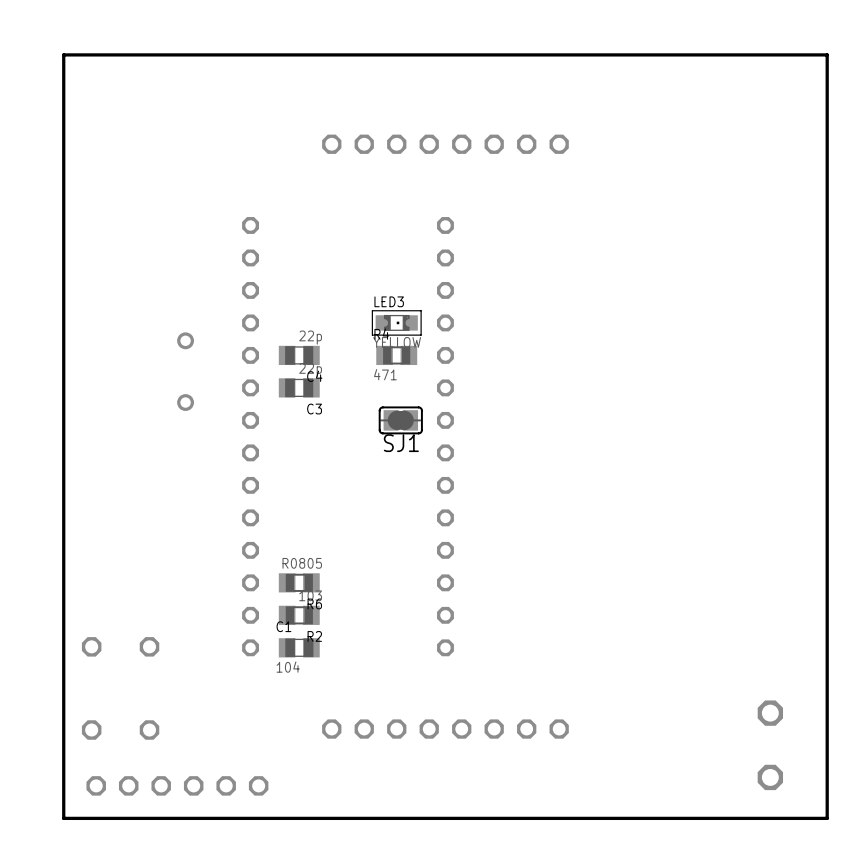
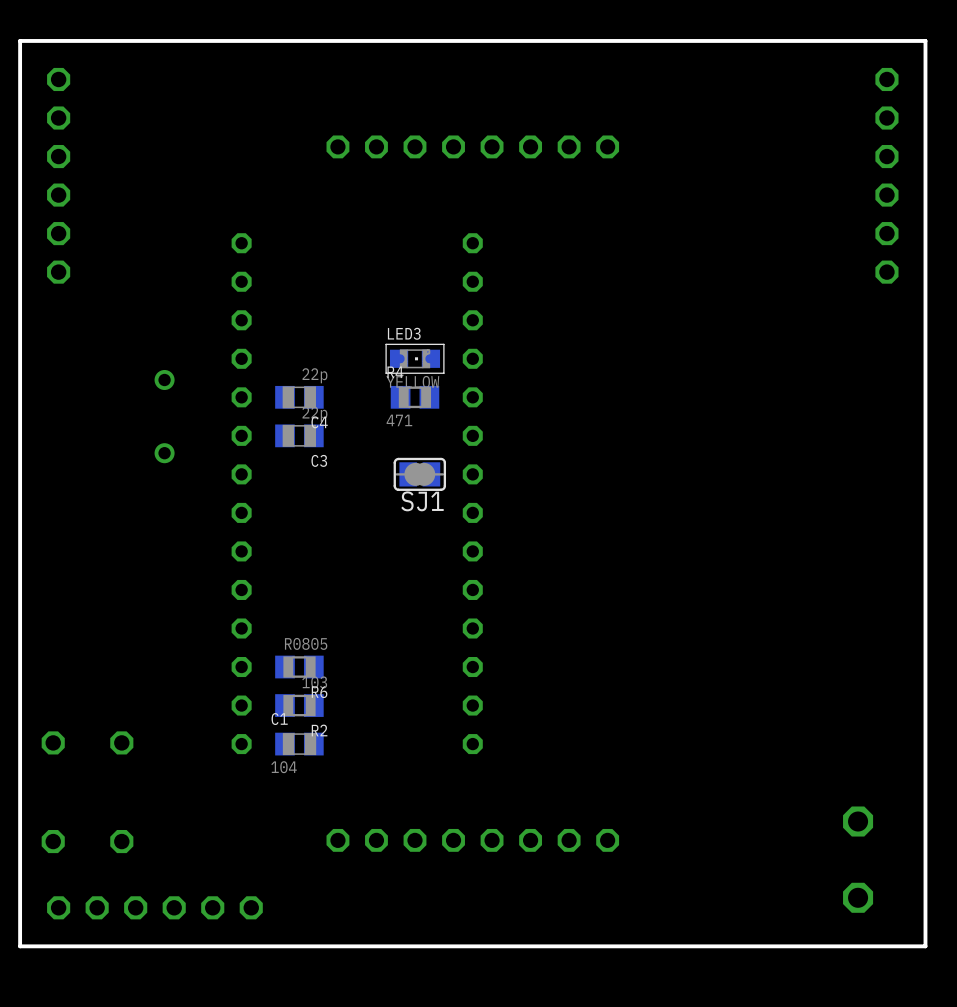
part: none -> (58, 175)
part: none -> (886, 175)

